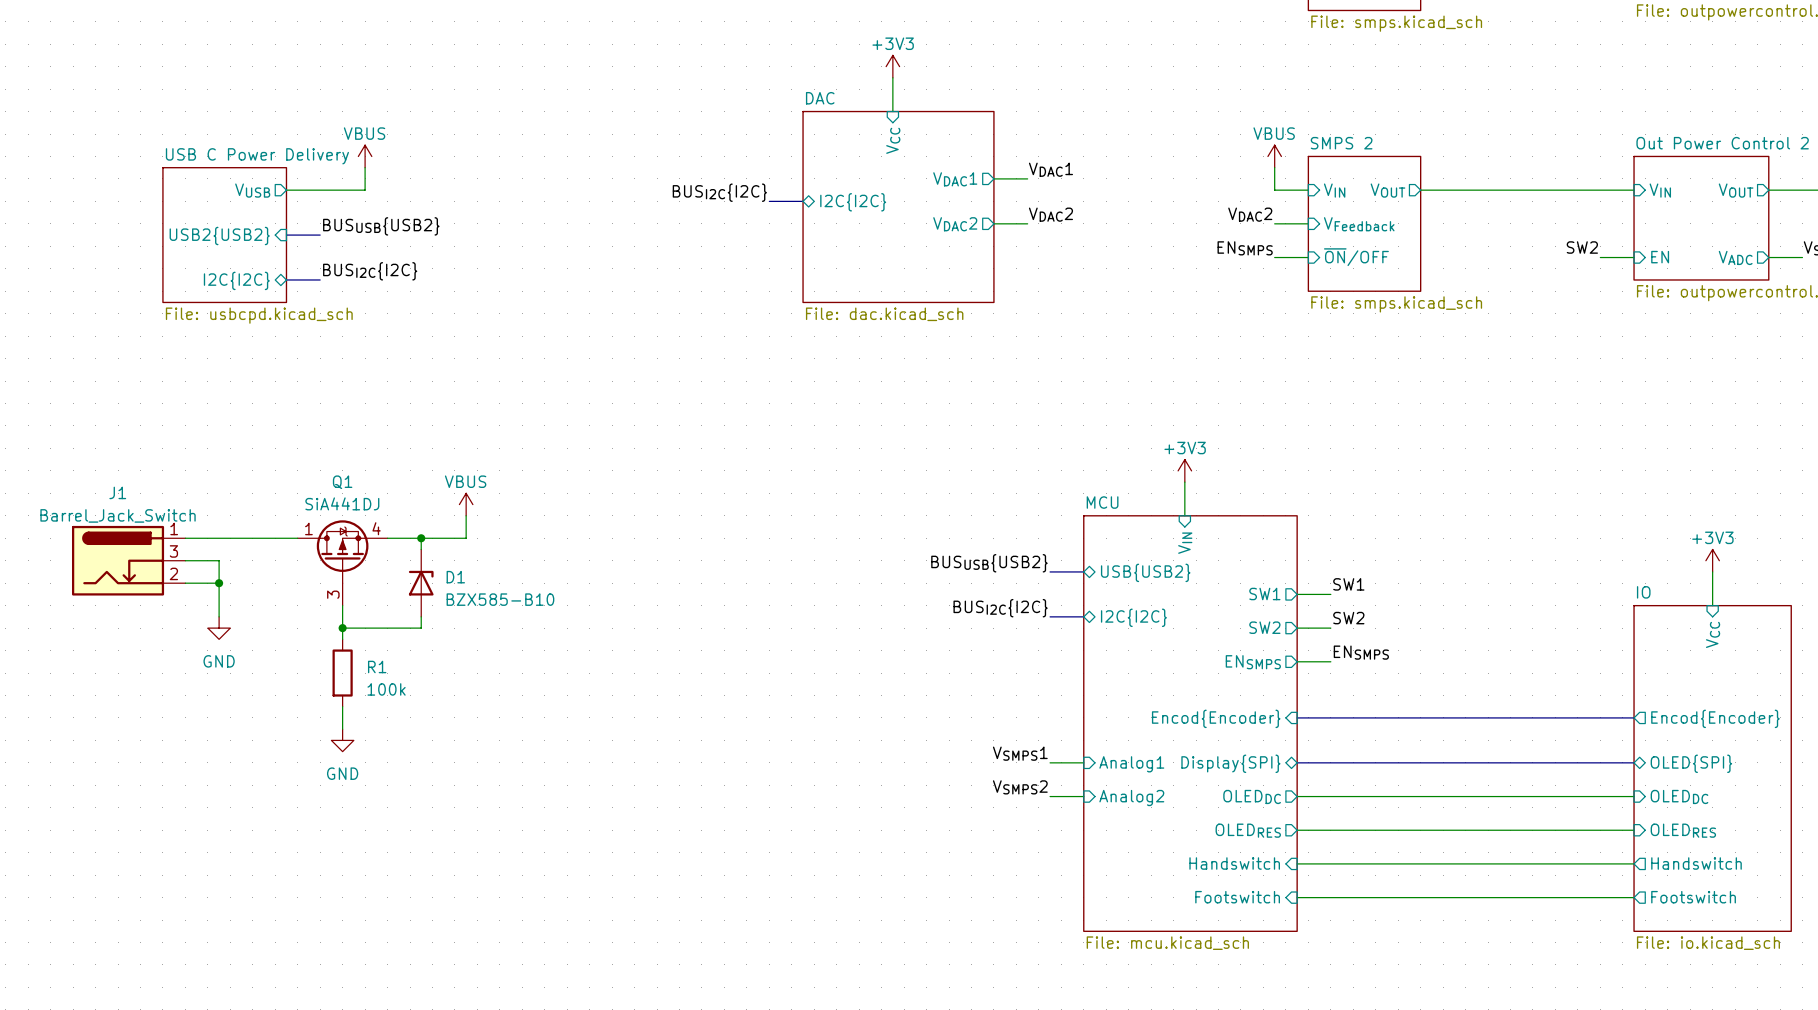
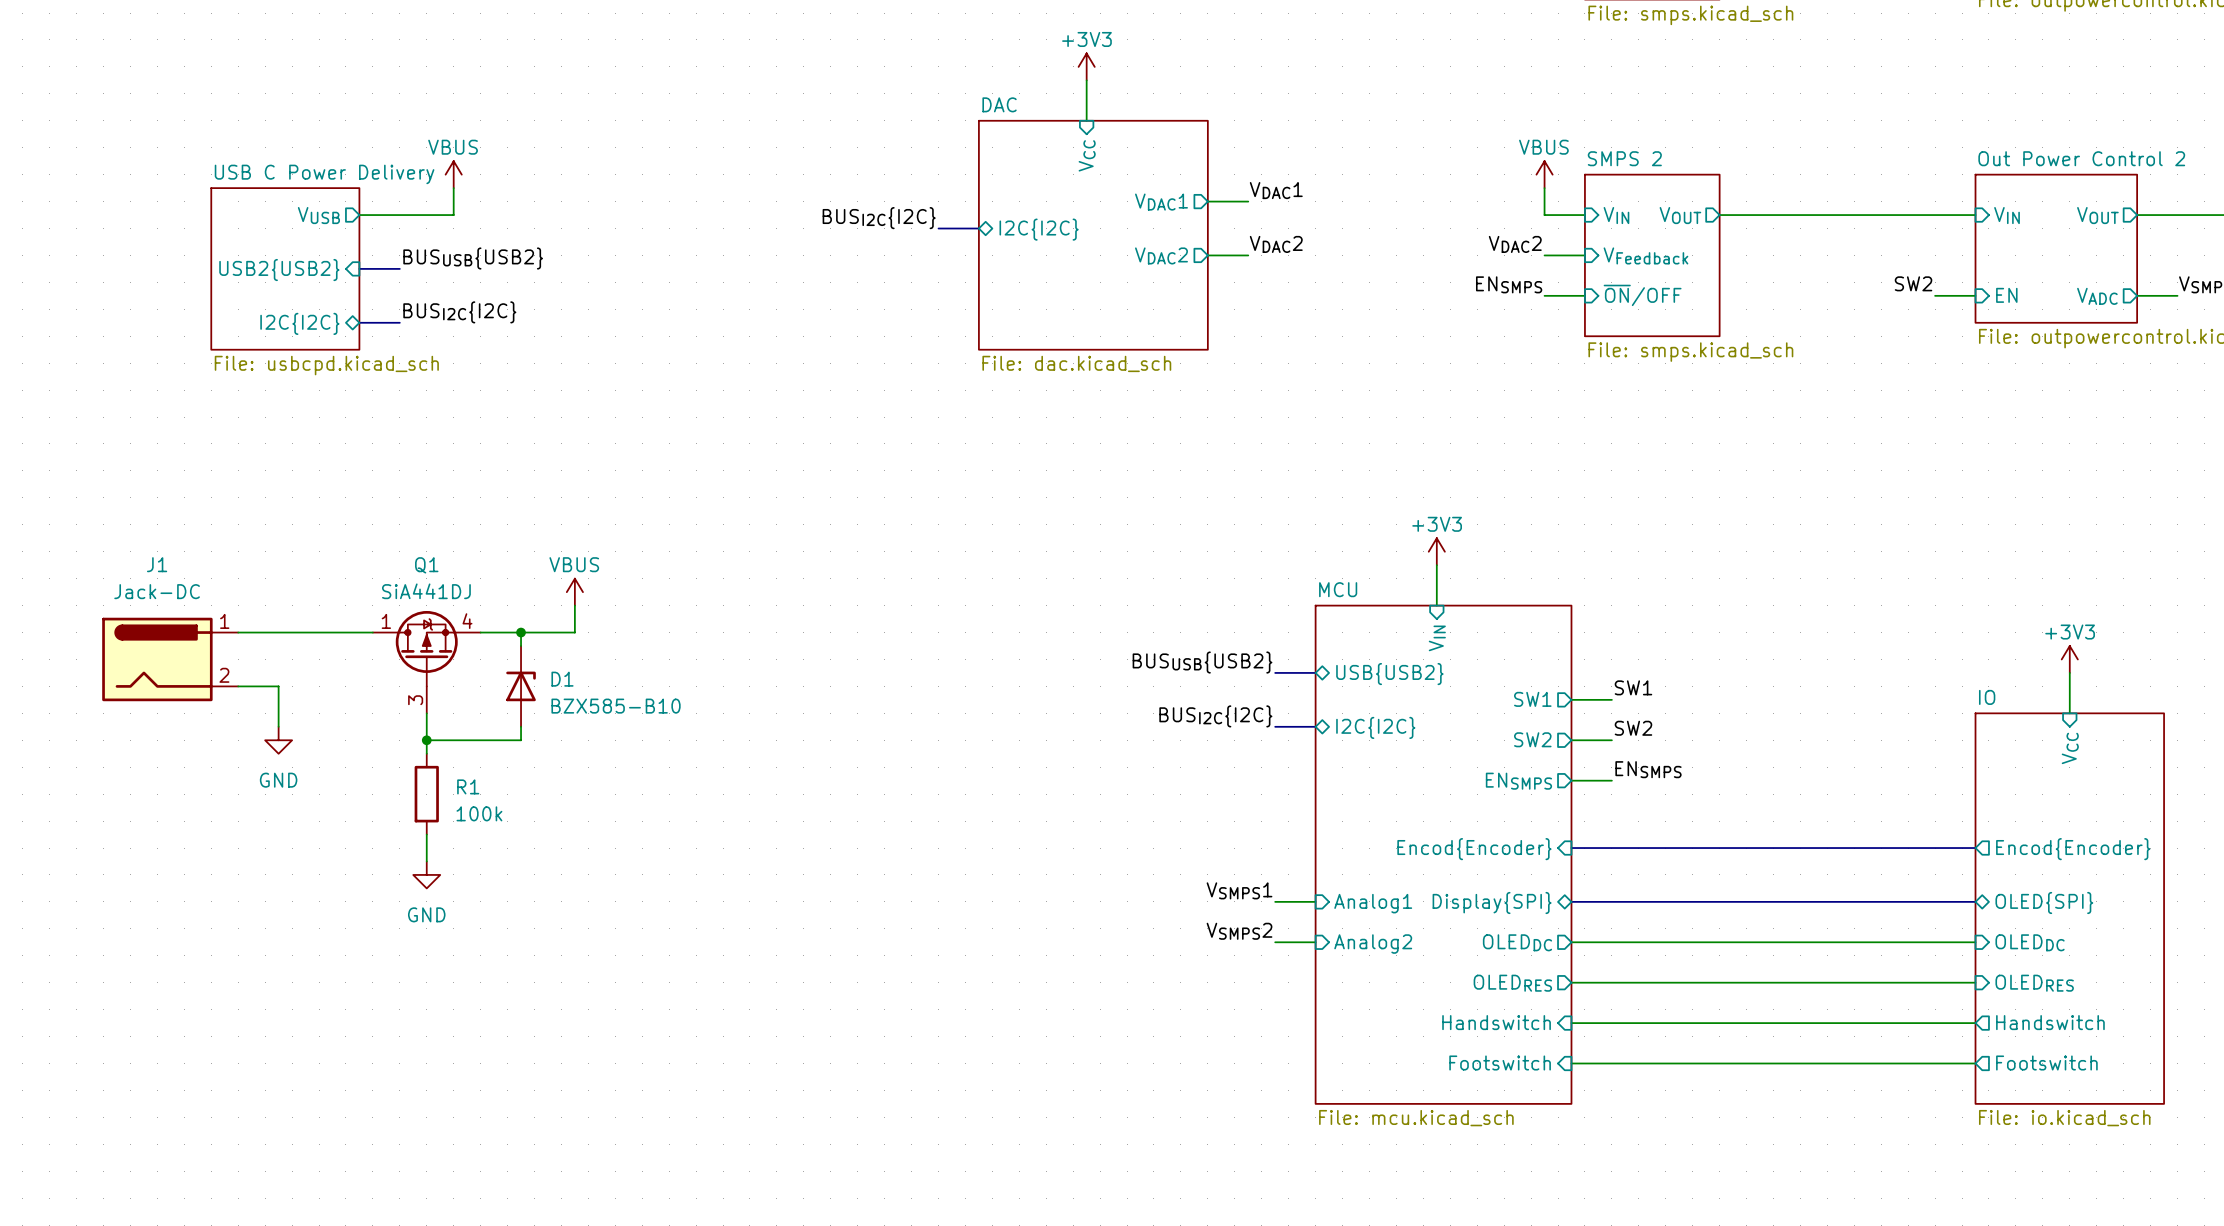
J1 value: Barrel_Jack_Switch (118, 515) -> Jack-DC (157, 591)
J1 symbol: [71, 525, 186, 596] -> [102, 617, 239, 702]
wire: (185, 560) (219, 560) (219, 583) -> none
junction: (219, 583) -> none

